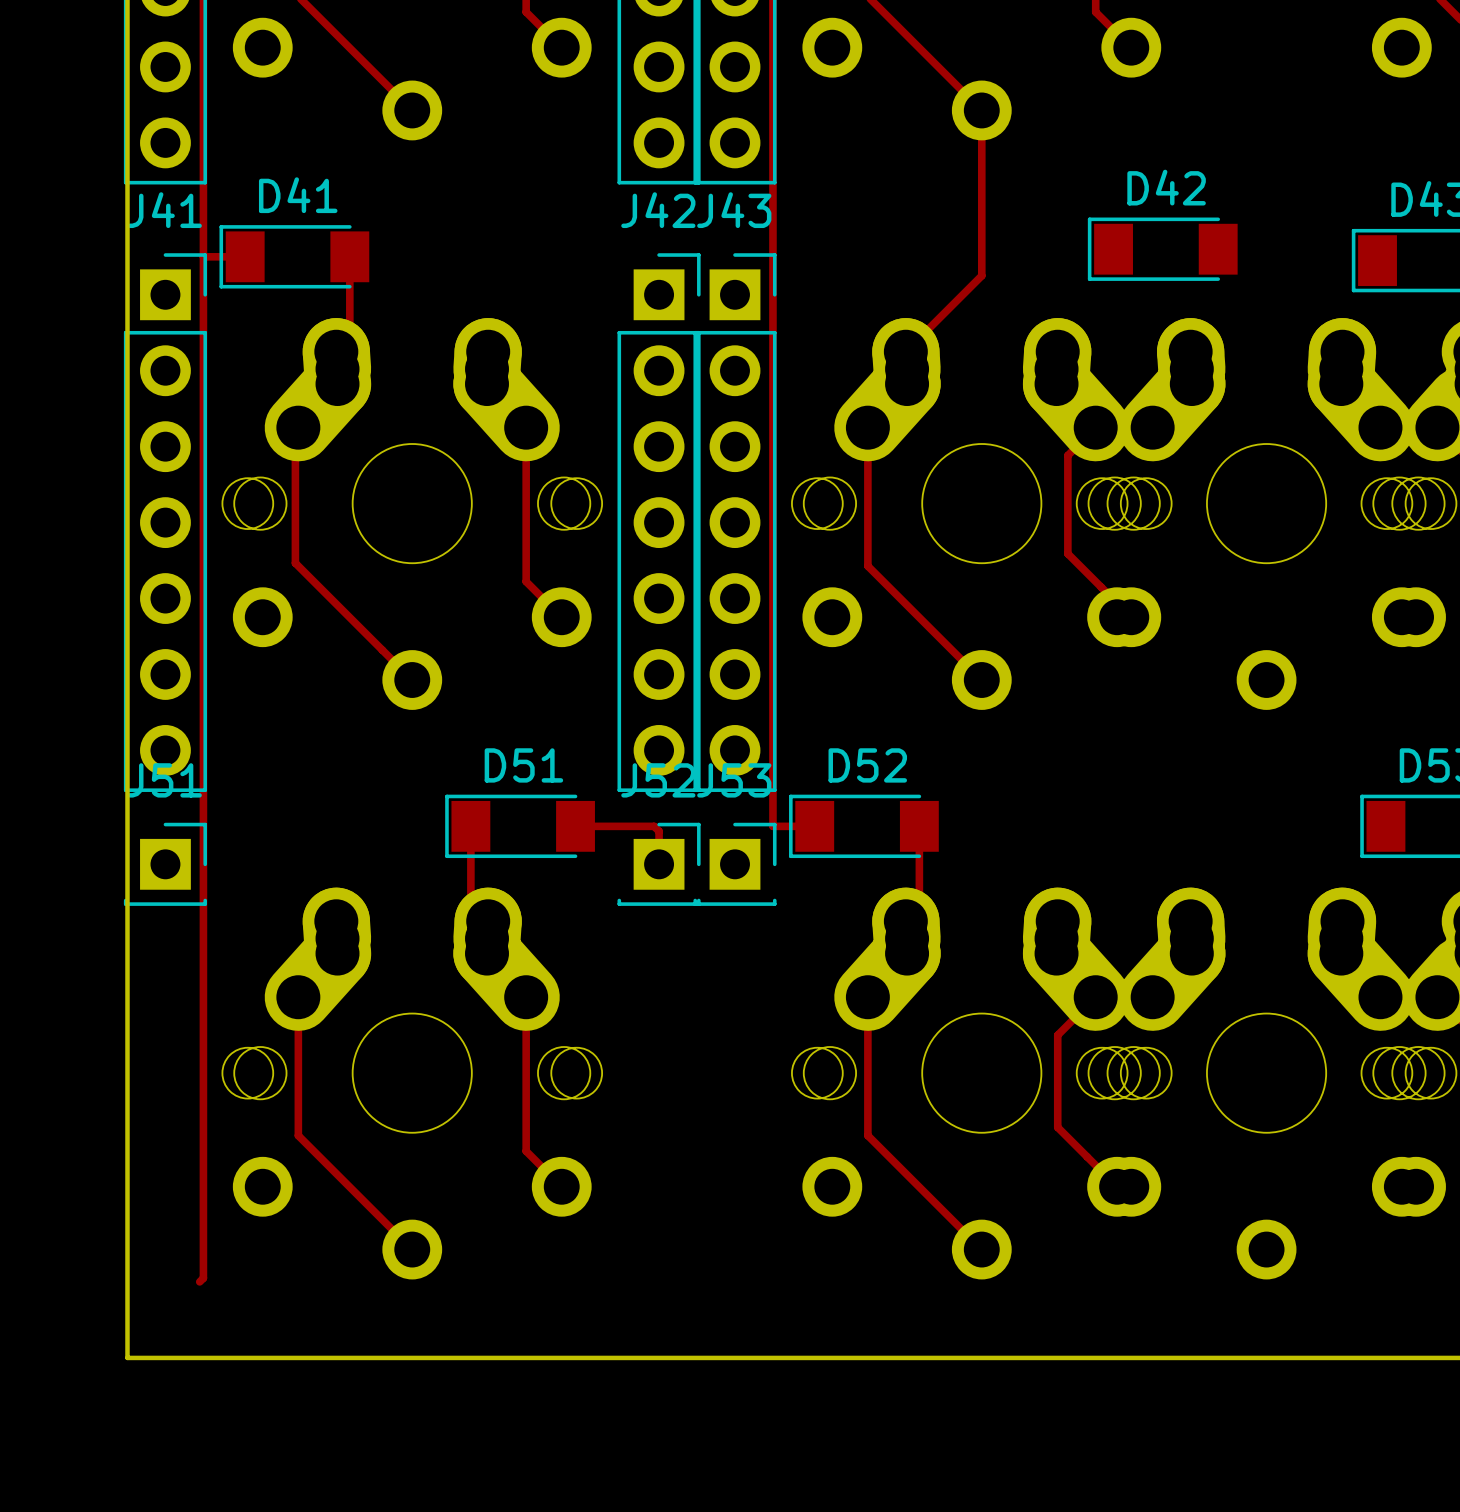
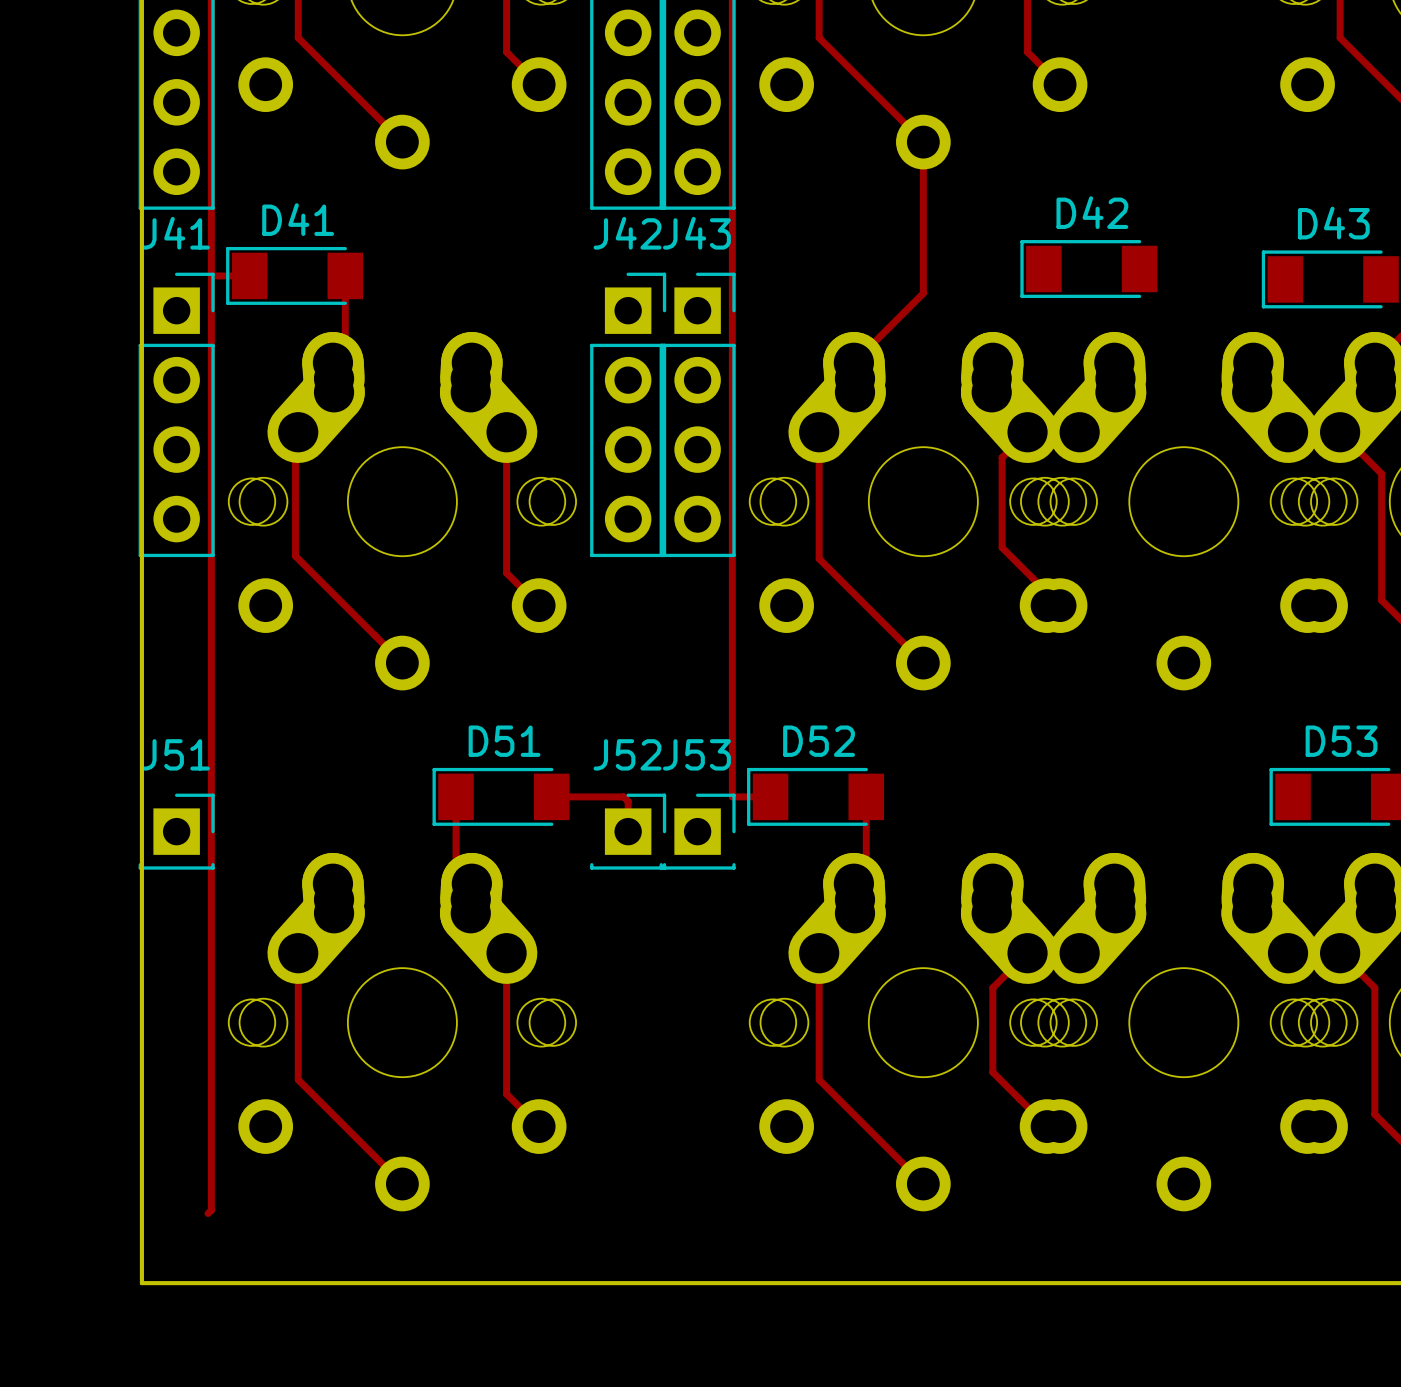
J41 footprint: [123, 253, 208, 792] -> [138, 272, 215, 558]
J42 footprint: [617, 253, 701, 792] -> [590, 272, 667, 558]
J43 footprint: [693, 253, 777, 792] -> [659, 272, 736, 558]

